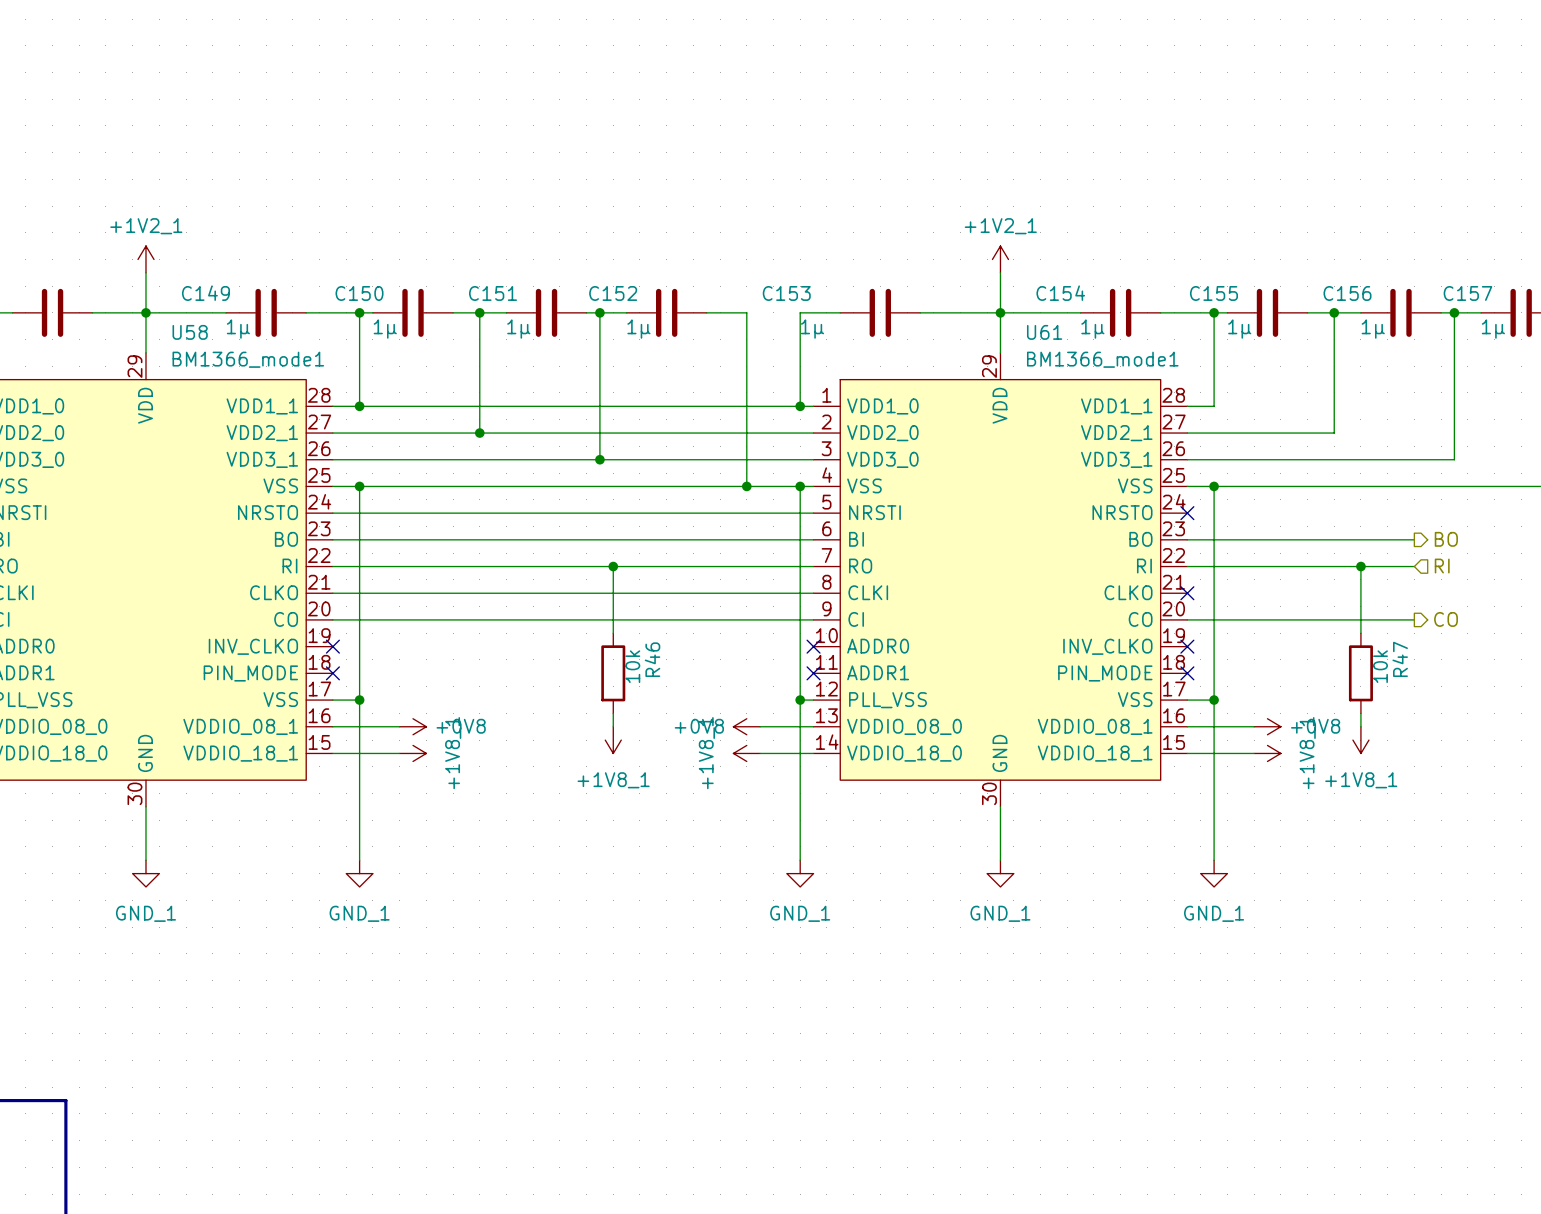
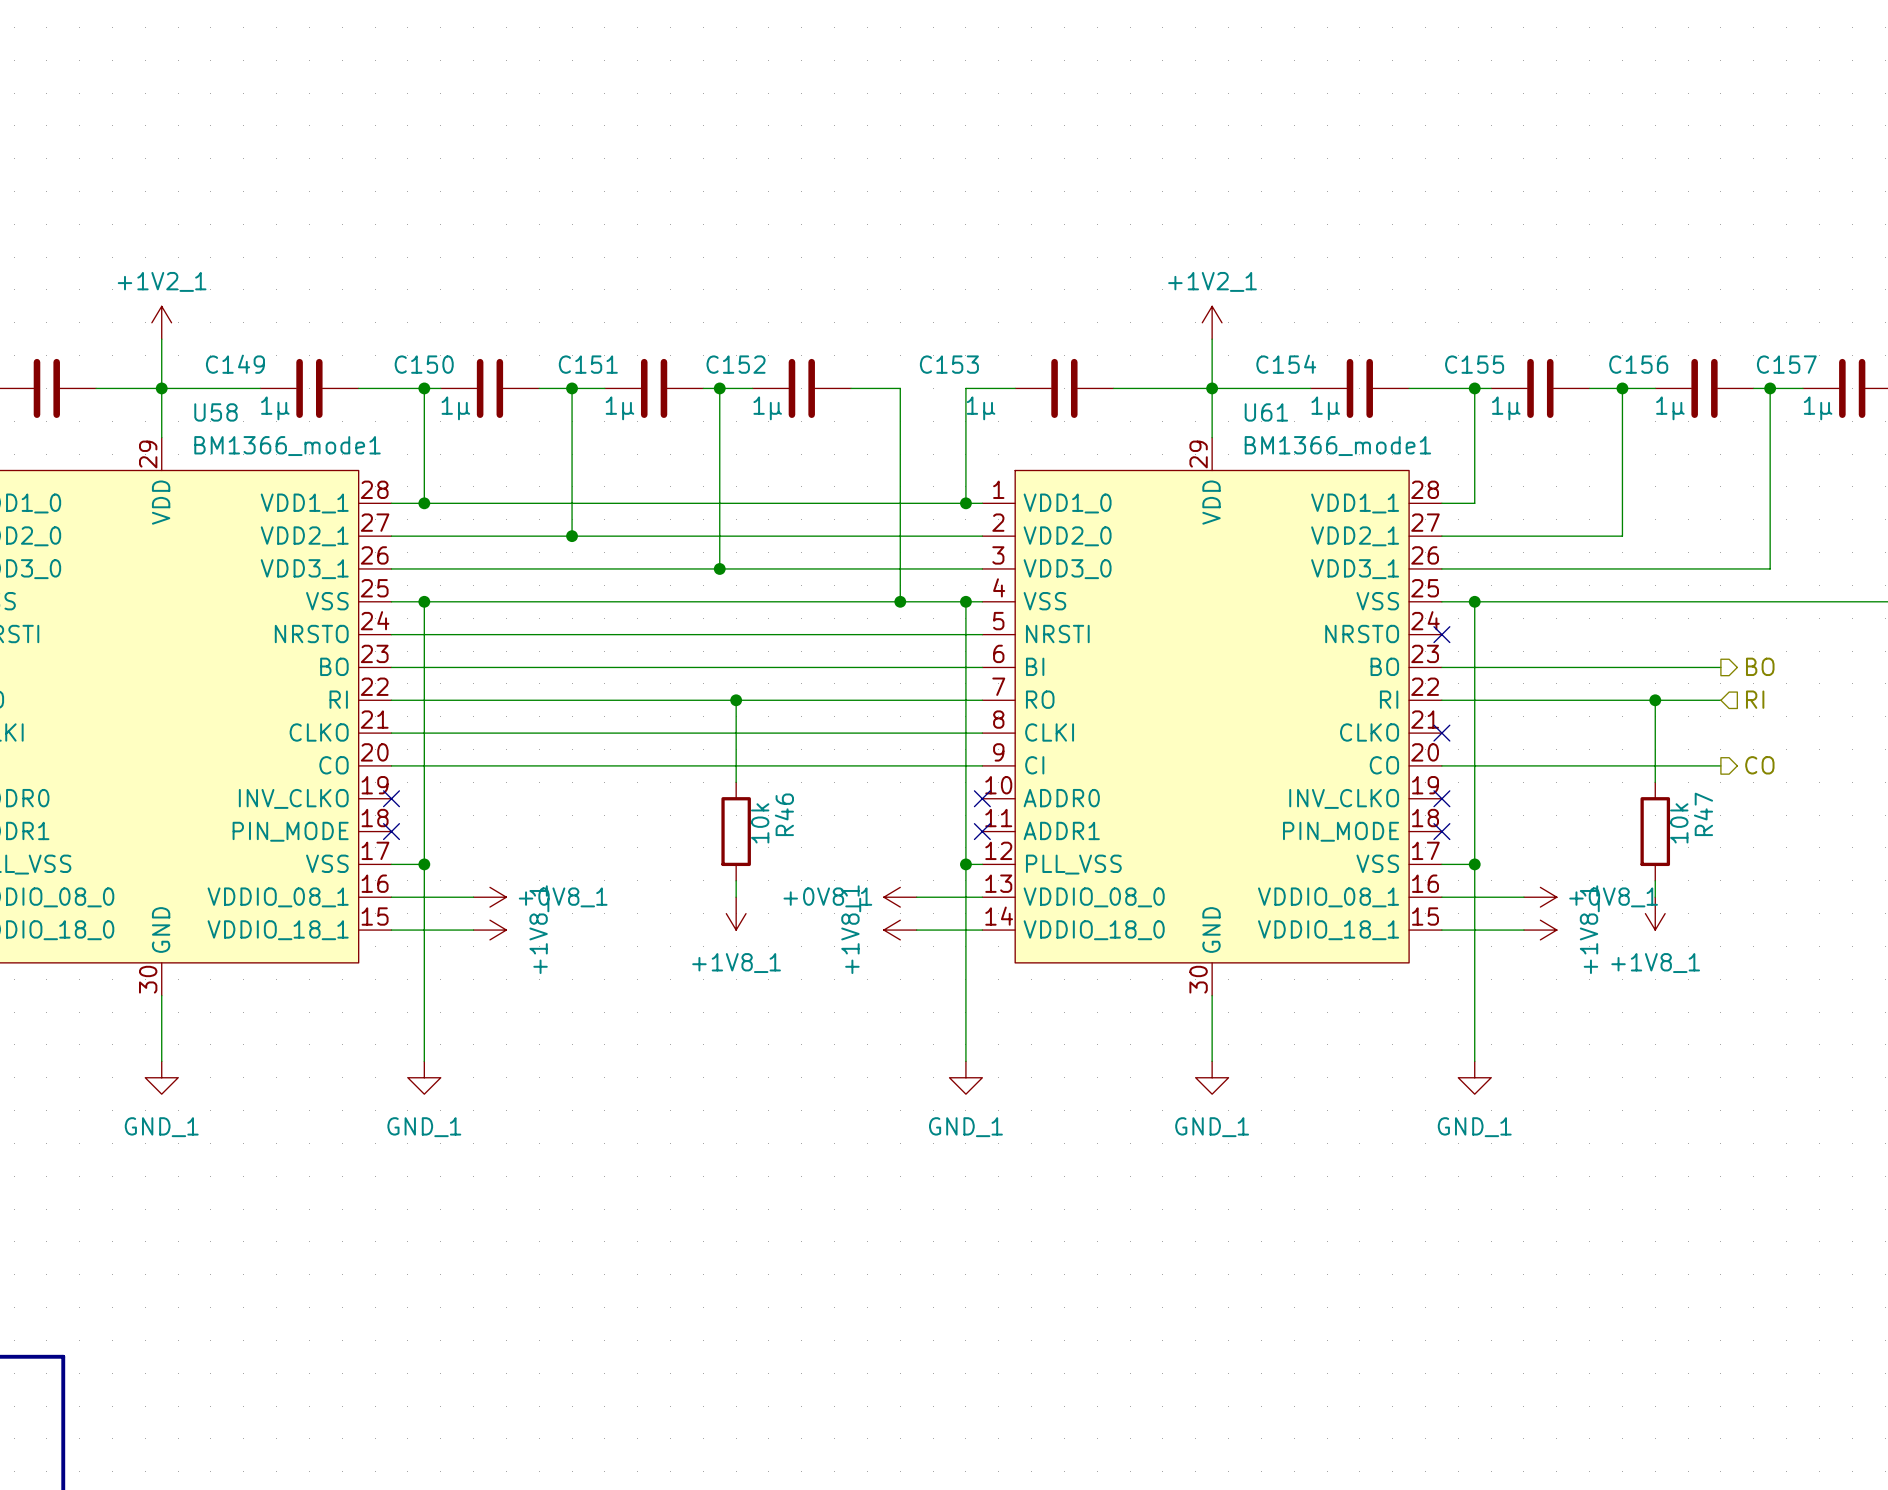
part value: +0V8 (461, 726) -> +0V8_1 (563, 897)
part value: +0V8 (699, 726) -> +0V8_1 (827, 897)
part value: +0V8 (1315, 726) -> +0V8_1 (1613, 897)

